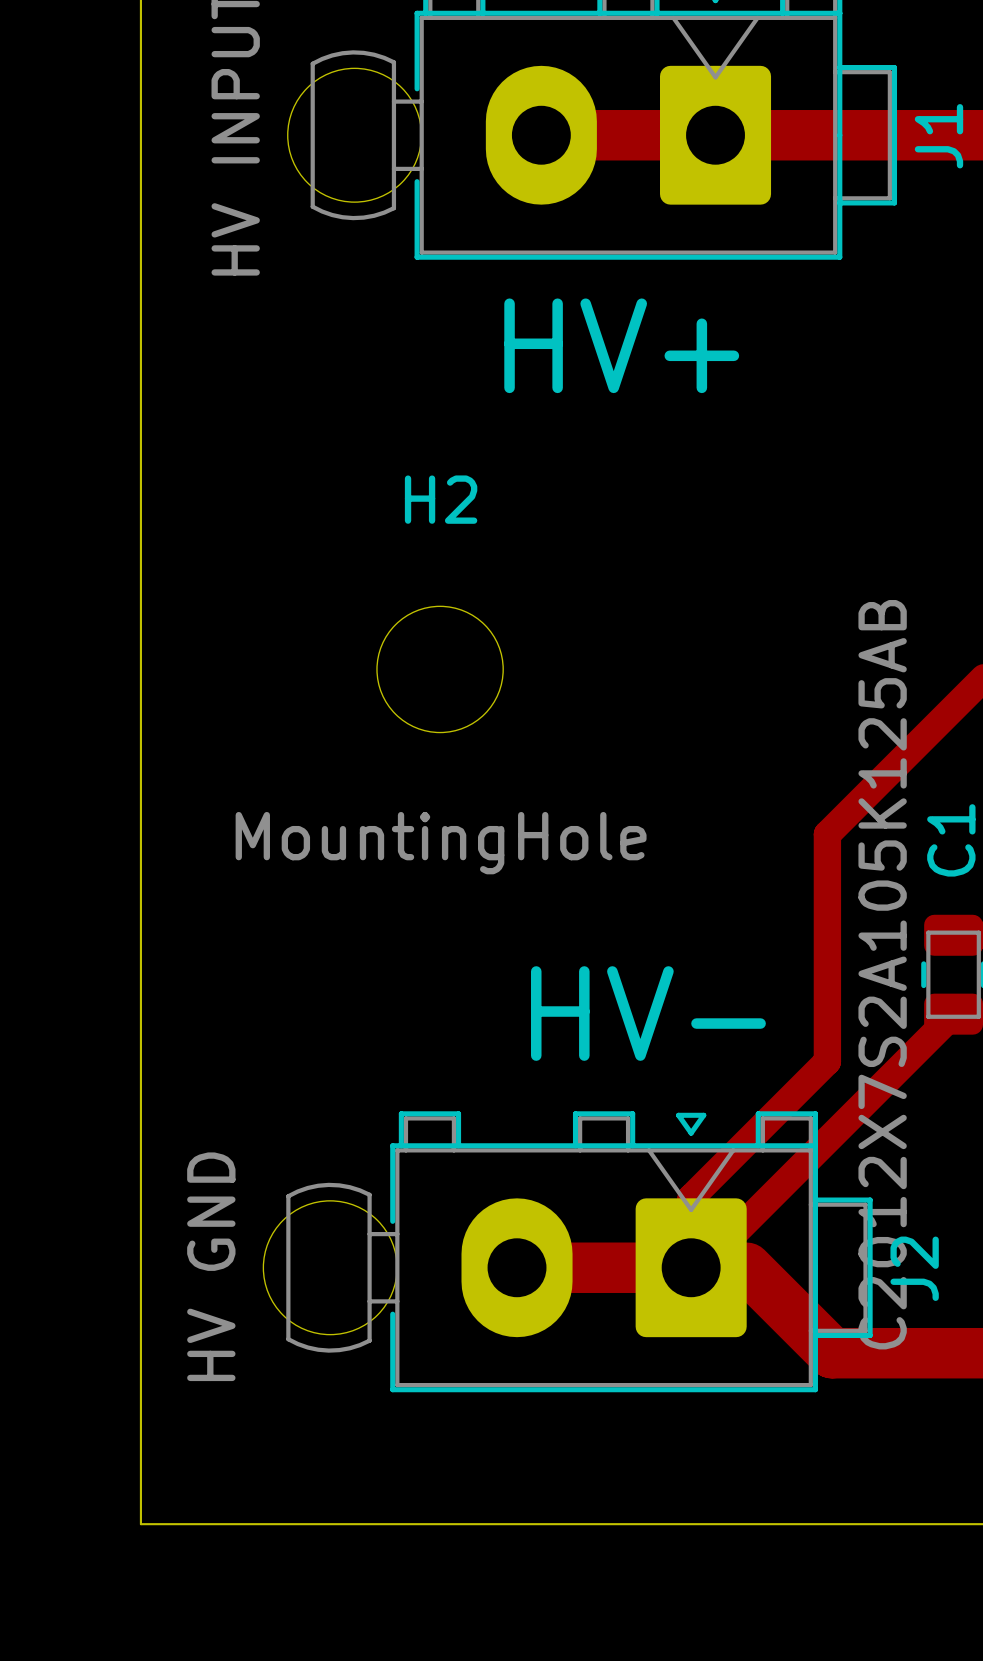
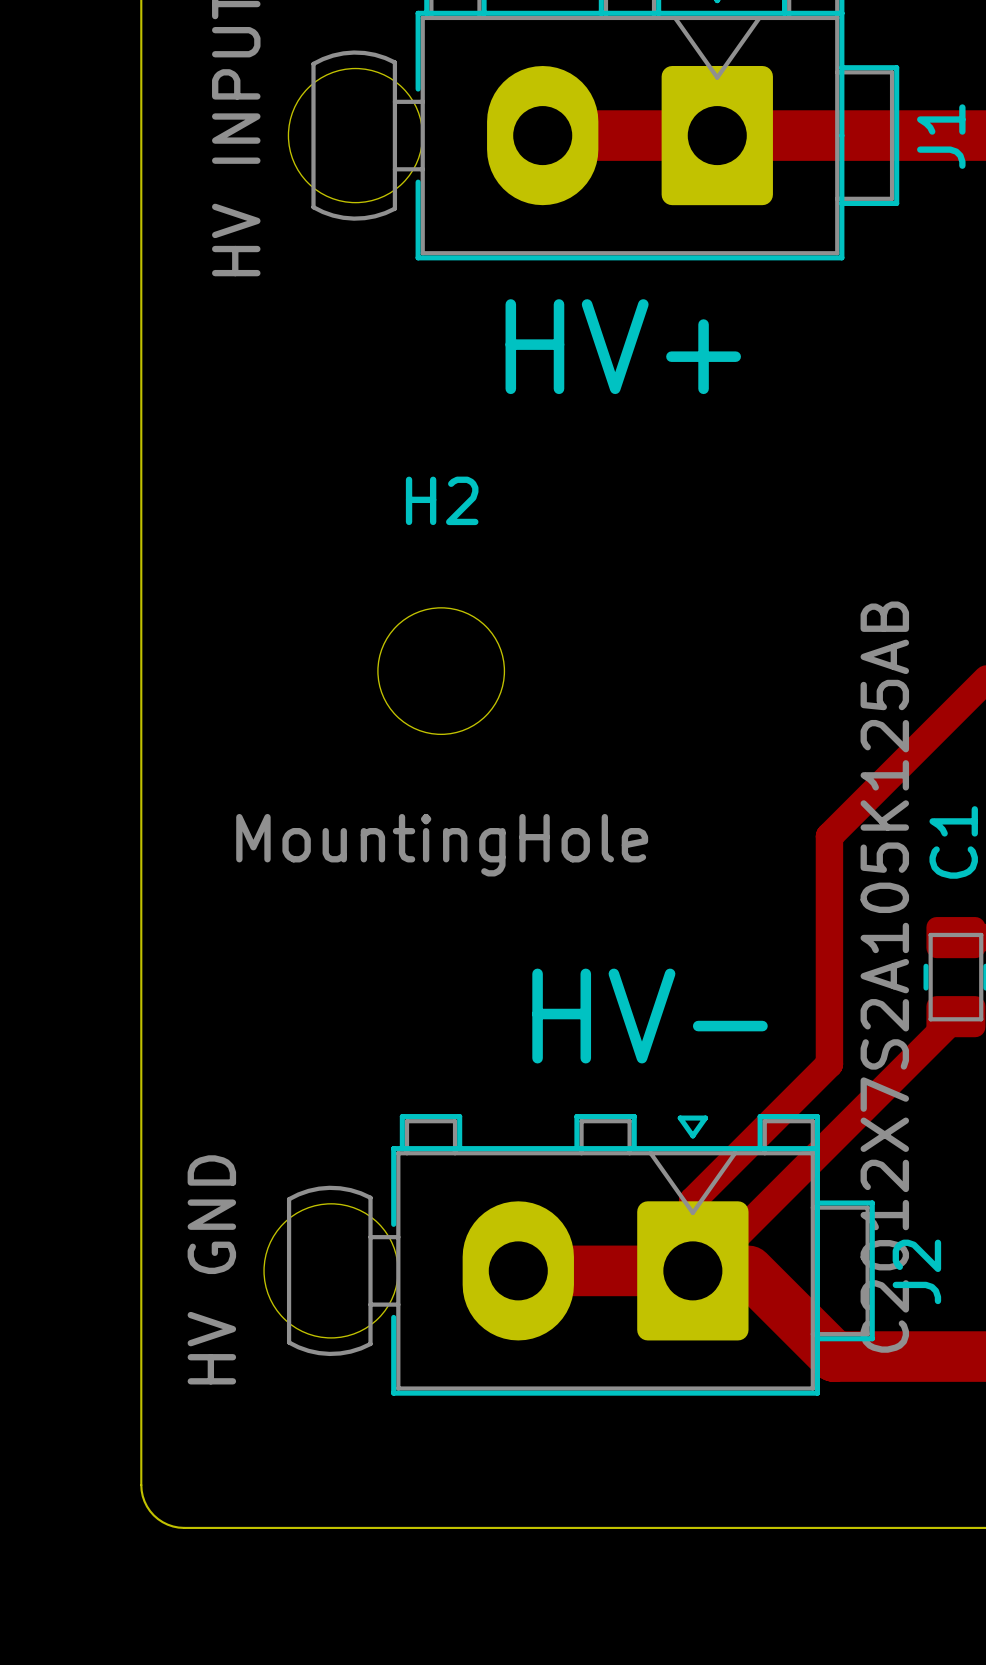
board edge: (140, 1481) (140, 1524) (183, 1524) -> (141, 1485) (144, 1501) (153, 1515) (167, 1524) (184, 1527)

